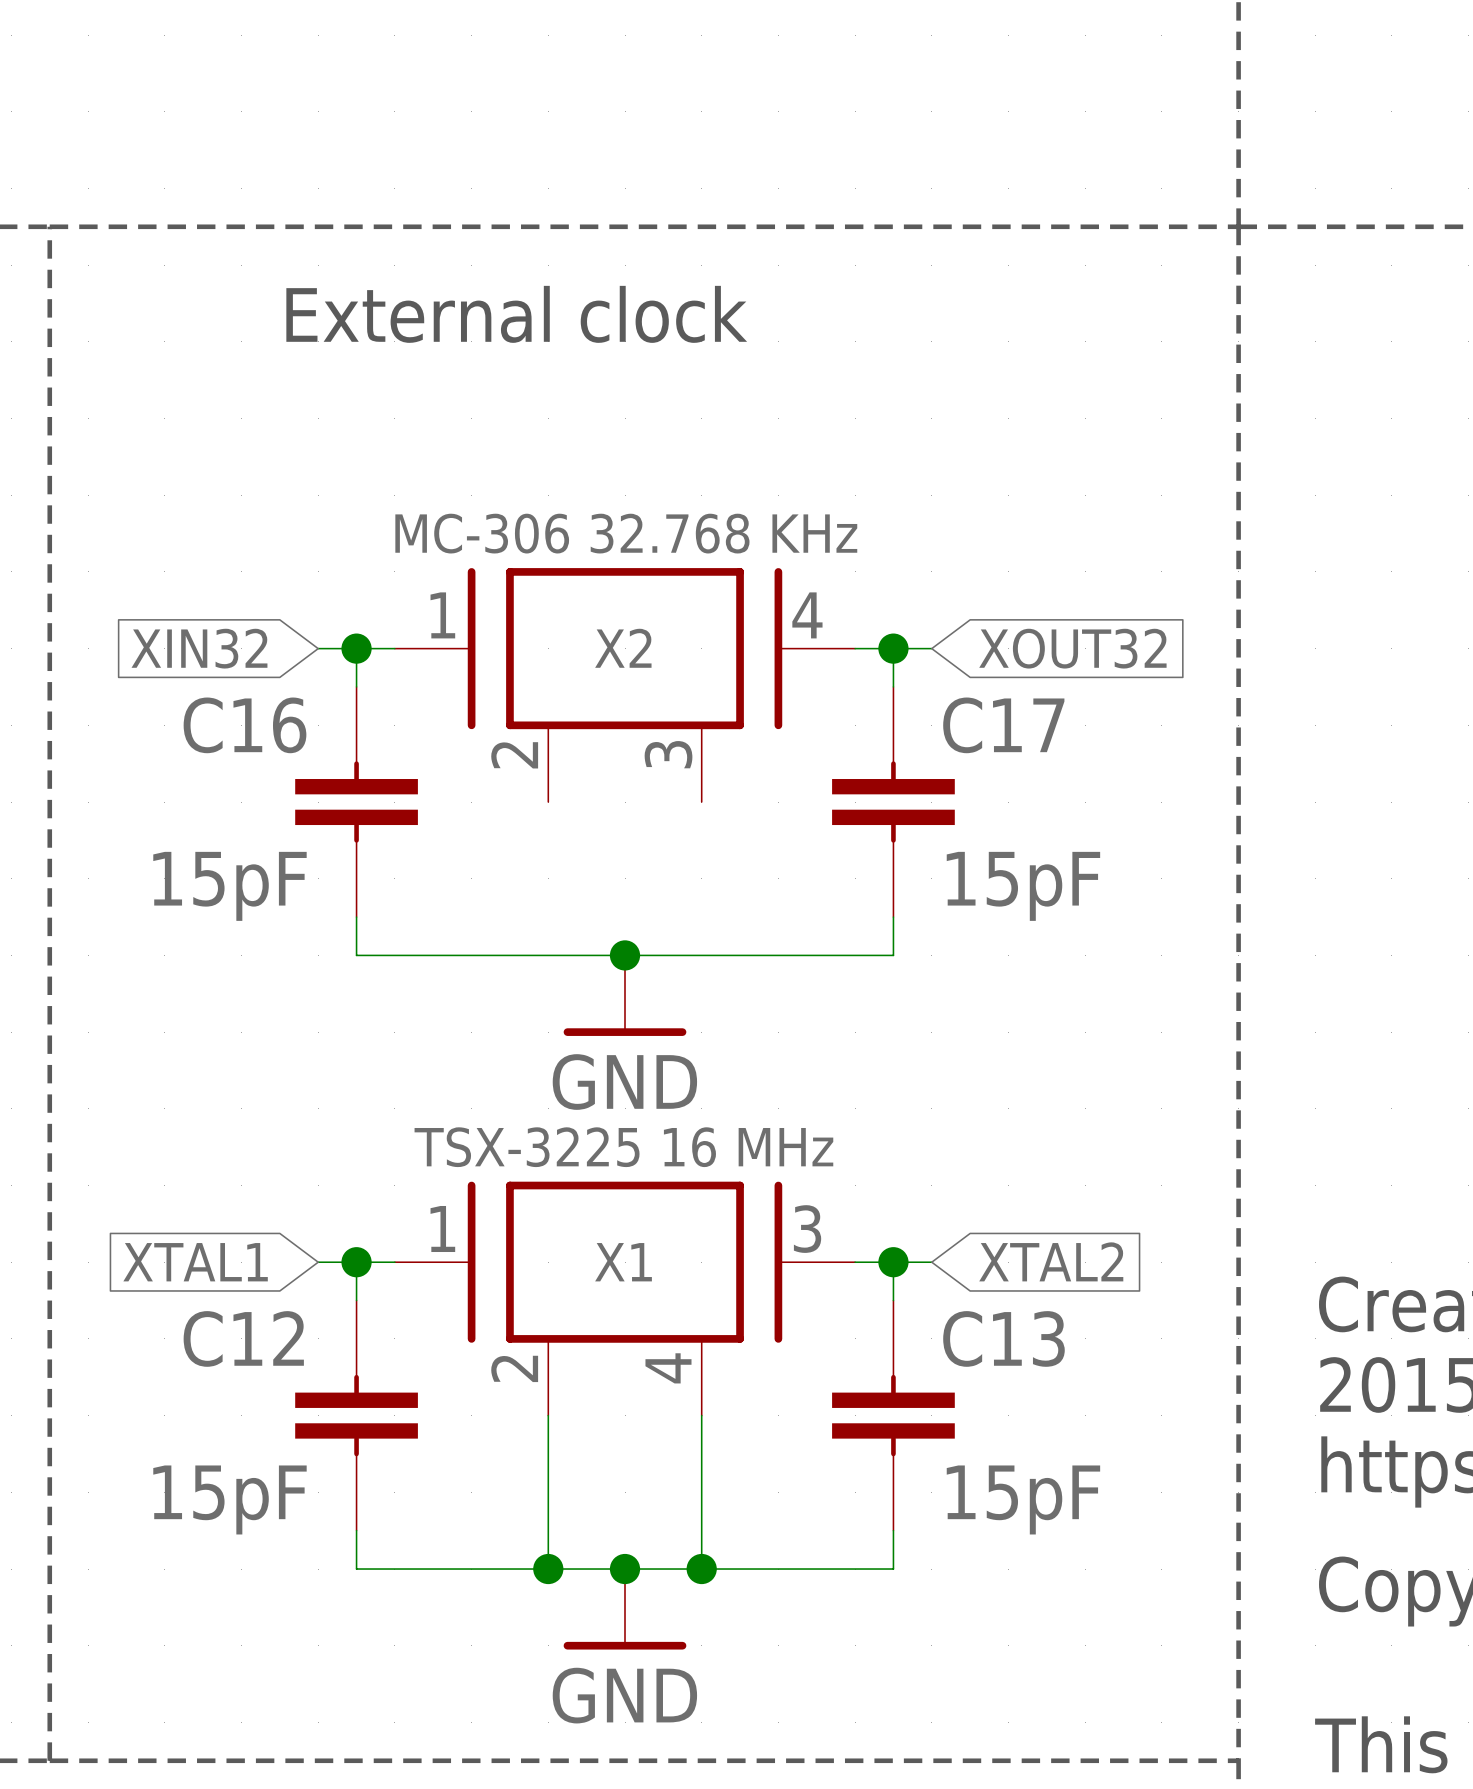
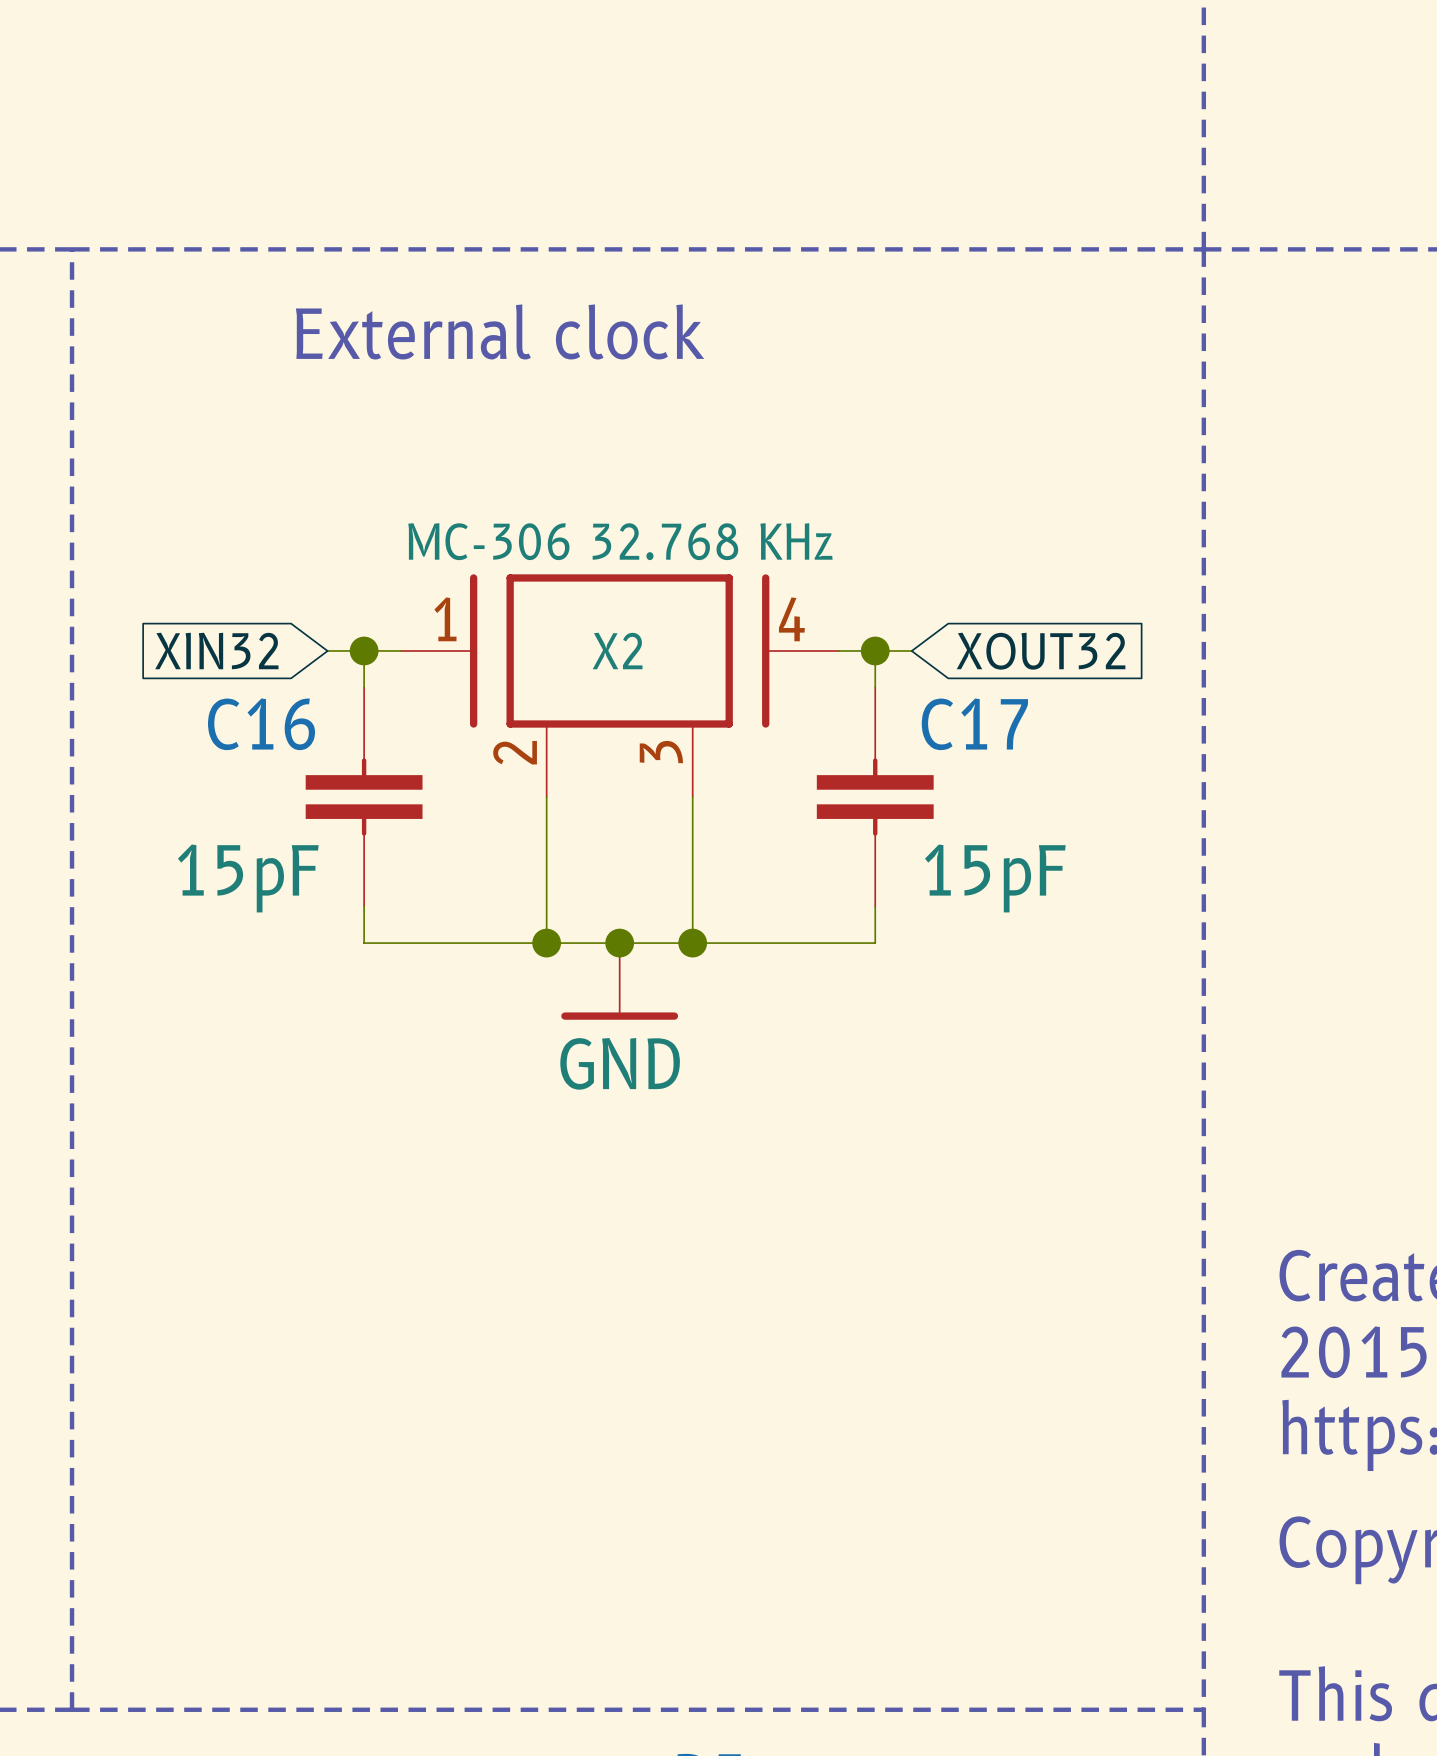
junction: none -> (546, 943)
junction: none -> (692, 943)
global label: XTAL2 (1051, 1261) -> none
global label: XTAL1 (195, 1262) -> none
wire: (318, 1262) (394, 1262) -> none
wire: (356, 1262) (356, 1300) -> none
junction: (356, 1262) -> none
wire: (855, 1262) (931, 1262) -> none
wire: (893, 1262) (893, 1300) -> none
junction: (893, 1262) -> none
X1: TSX-3225 16 MHz (625, 1298) -> none
C12: 15pF (356, 1415) -> none
wire: (548, 1415) (548, 1569) -> (546, 797) (546, 943)
wire: (701, 1415) (701, 1569) -> (692, 797) (692, 943)
C13: 15pF (893, 1415) -> none
wire: (356, 1530) (356, 1569) (893, 1569) (893, 1530) -> none
junction: (548, 1569) -> none
junction: (625, 1569) -> none
junction: (701, 1569) -> none
power symbol: GND (625, 1609) -> none

